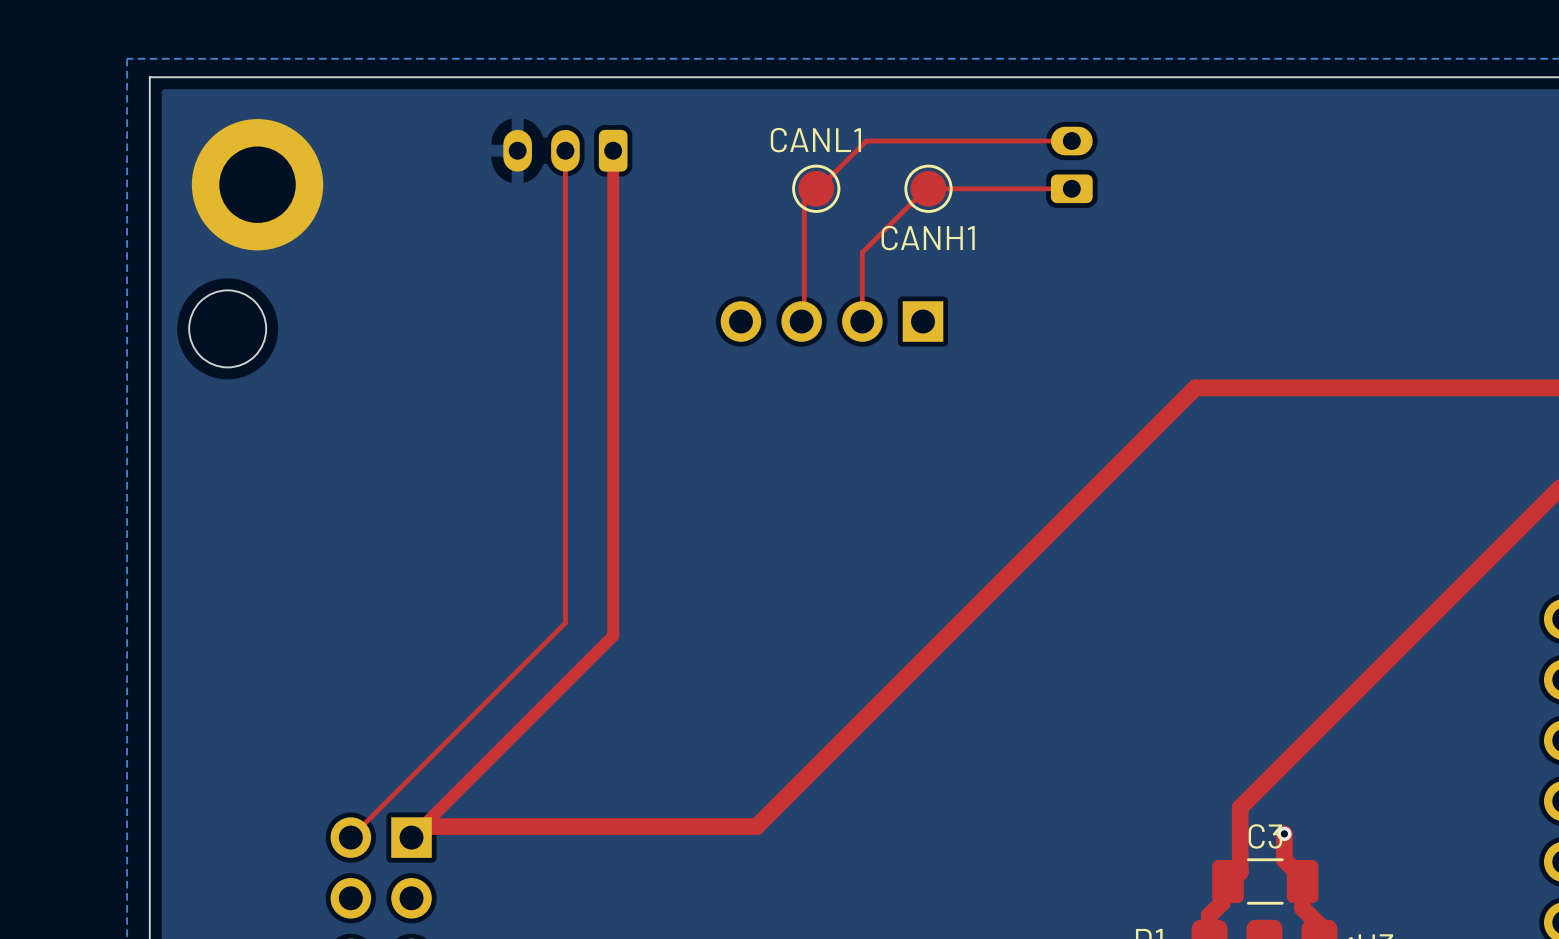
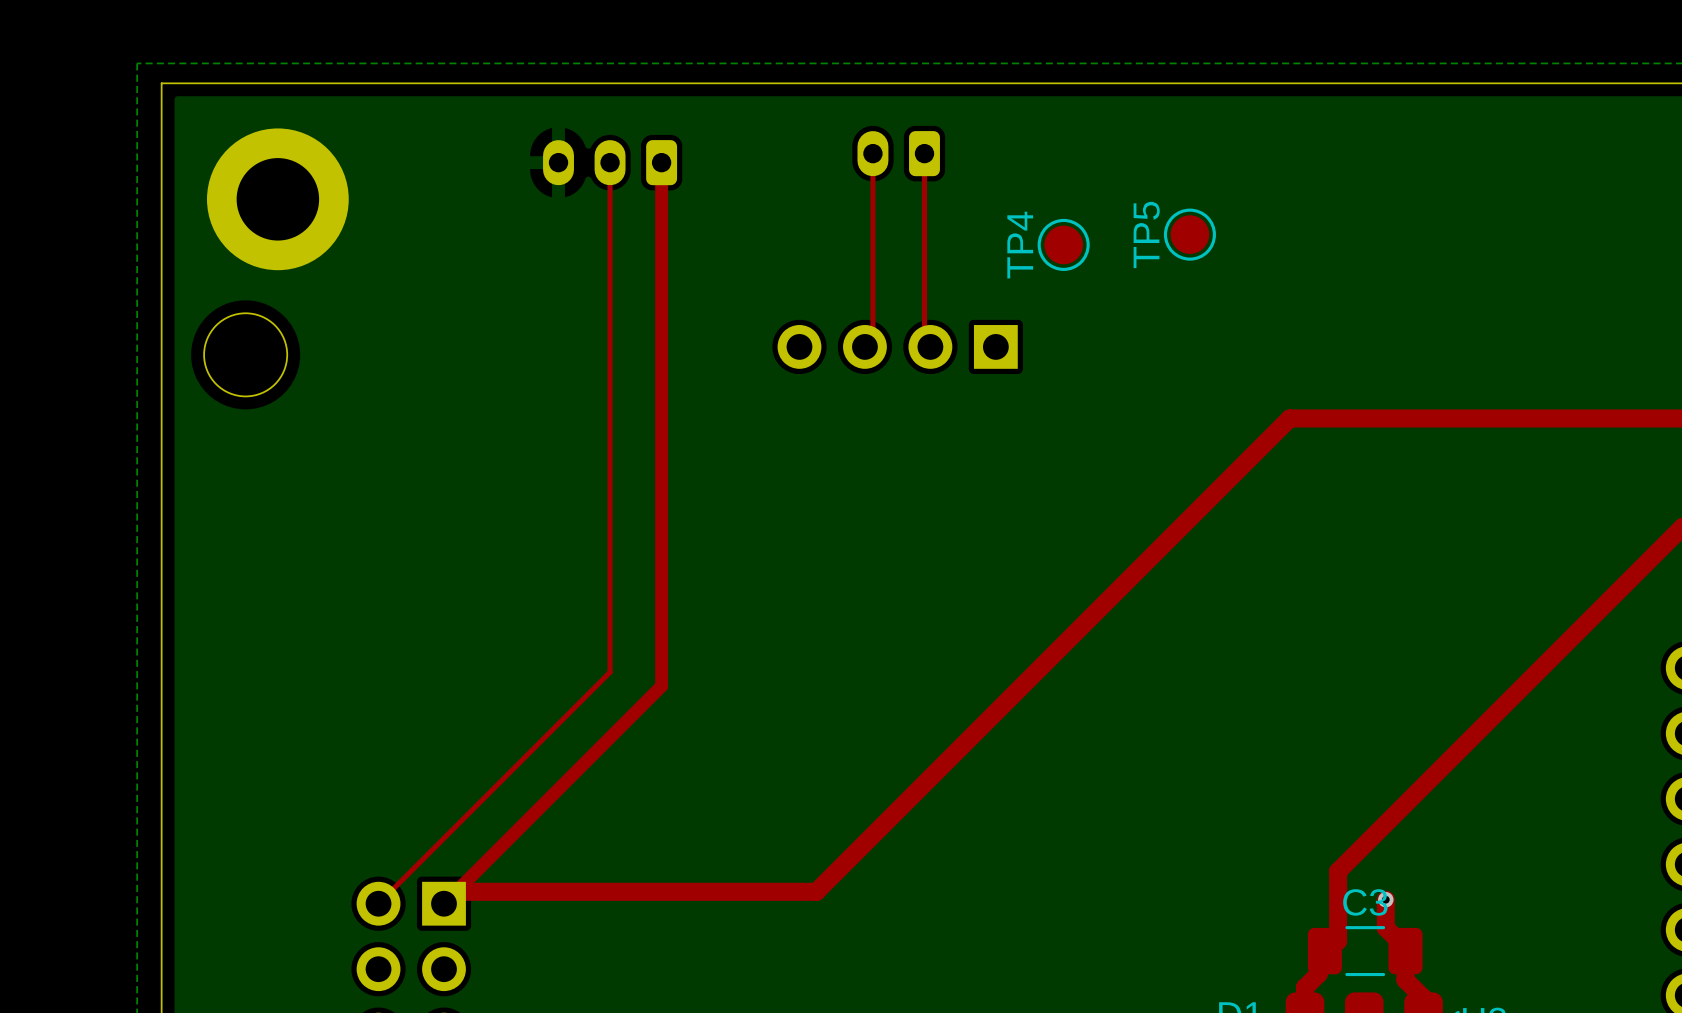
top track: (1071, 141) (866, 141) (804, 200) (804, 318) -> (872, 153) (872, 338) (867, 344)
part rotation: 0° (1071, 164) -> 90° counterclockwise (898, 153)
part position: (1071, 164) -> (898, 153)
CANL1: (816, 188) -> none
CANH1: (928, 188) -> none
top track: (1071, 188) (926, 188) (862, 252) (862, 321) -> (924, 153) (924, 341) (930, 346)
TP5: none -> (1189, 234)
TP4: none -> (1063, 244)

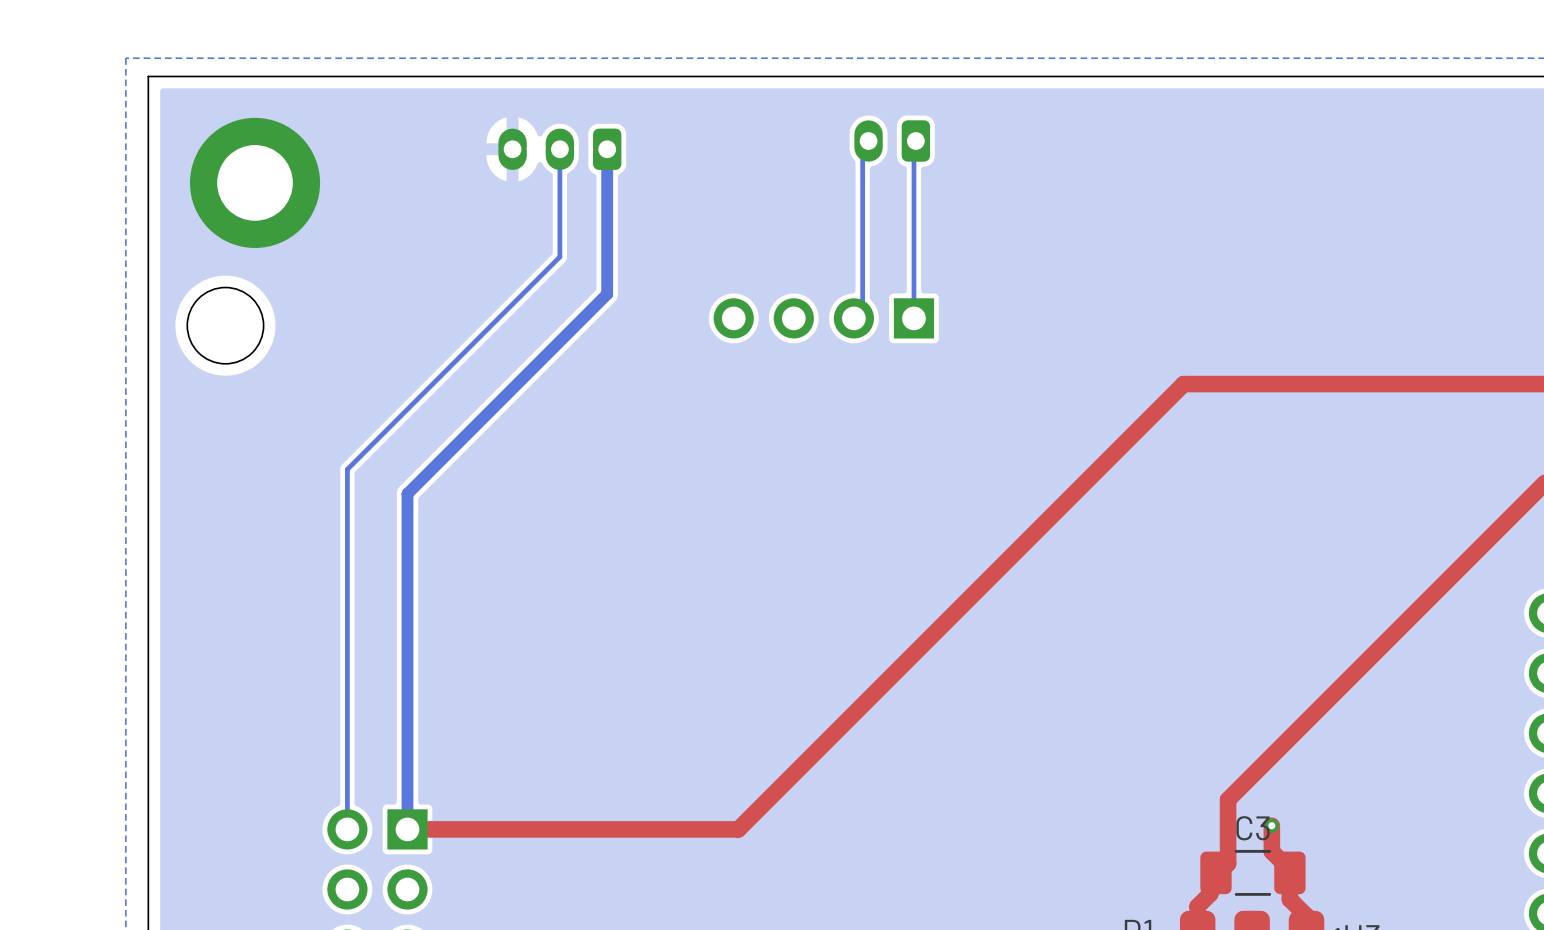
top track: (872, 153) (872, 338) (864, 346) -> none
part position: (898, 153) -> (892, 140)
top track: (924, 153) (924, 341) (930, 346) -> none
bottom track: none -> (868, 140) (862, 146) (862, 309) (853, 318)
bottom track: none -> (915, 140) (913, 142) (913, 318)
top track: (610, 162) (610, 672) (378, 903) -> none
bottom track: none -> (559, 149) (559, 256) (347, 469) (347, 829)
top track: (661, 162) (661, 686) (444, 903) (455, 891) (816, 891) -> (407, 829) (738, 829) (749, 818)
bottom track: none -> (607, 149) (607, 294) (407, 493) (407, 829)
TP5: (1189, 234) -> none
TP4: (1063, 244) -> none

